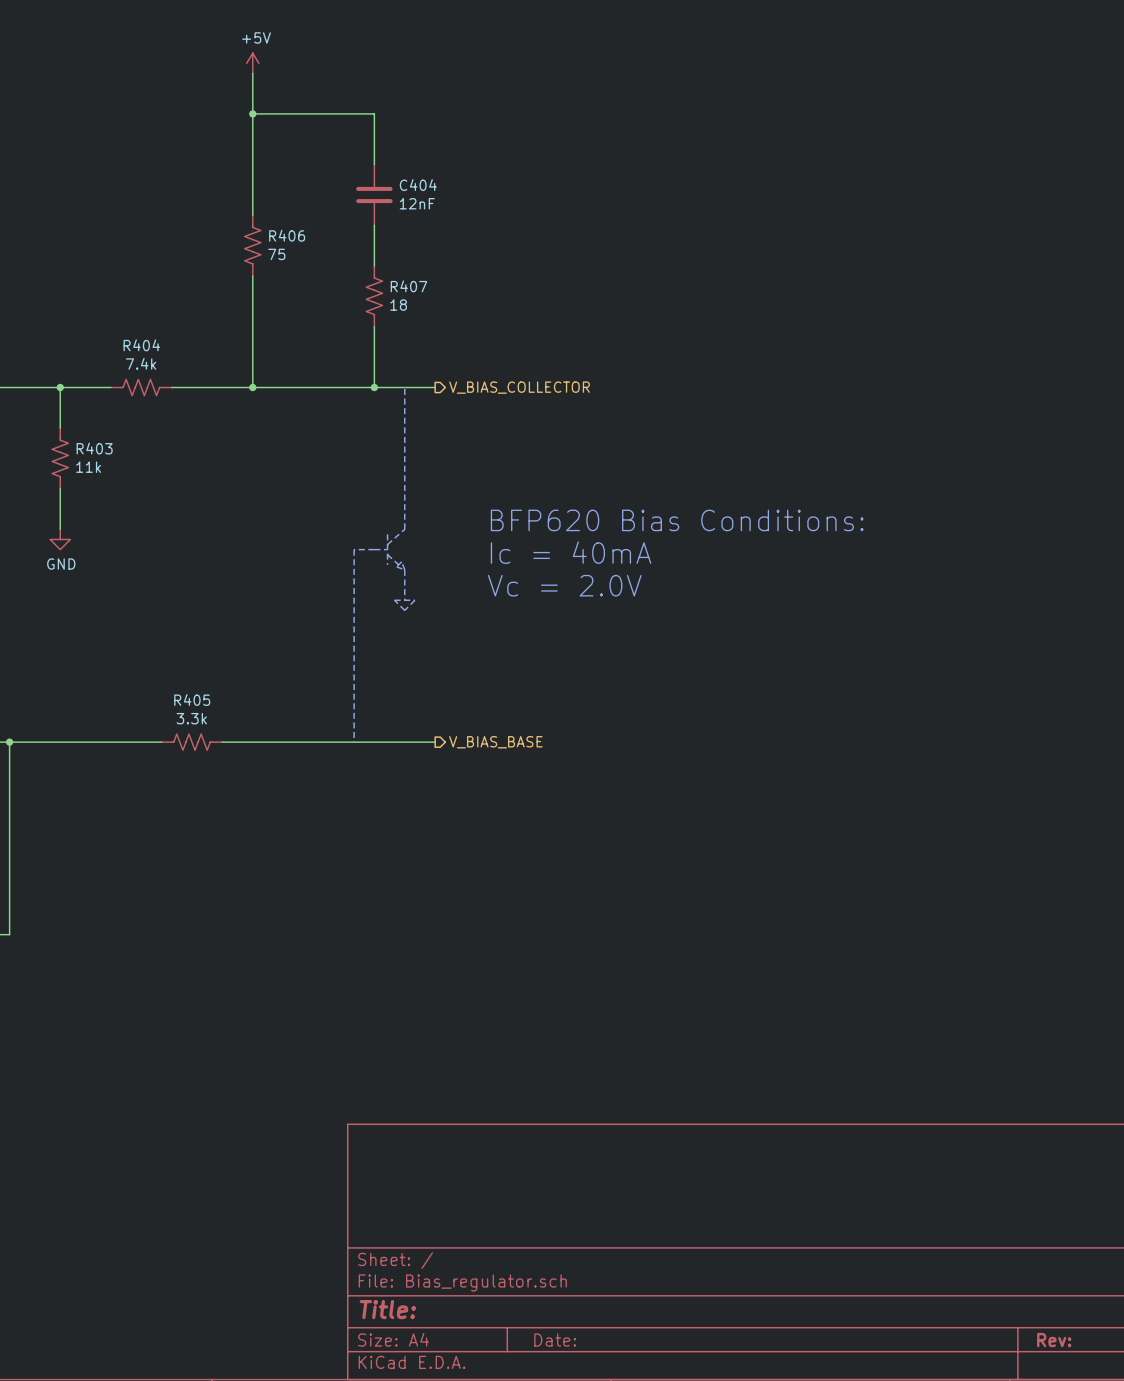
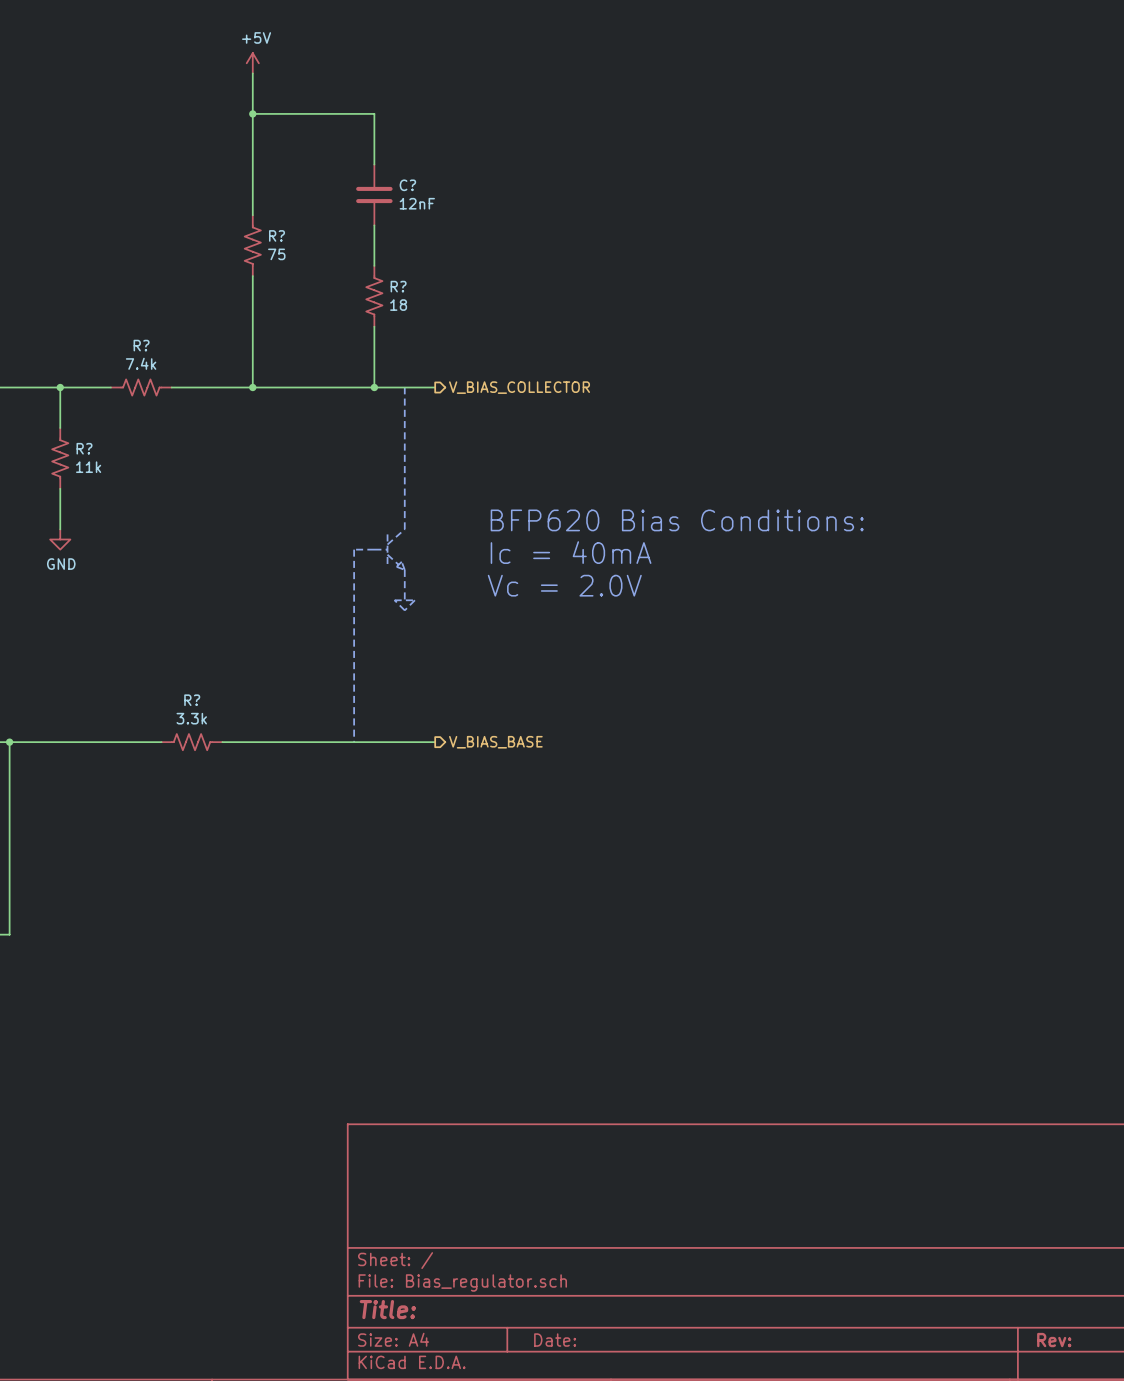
C404 name: C404 (418, 185) -> C? (407, 185)
R406 name: R406 (287, 235) -> R? (277, 235)
R407 name: R407 (408, 286) -> R? (398, 286)
R404 name: R404 (141, 345) -> R? (141, 345)
R403 name: R403 (94, 448) -> R? (84, 448)
R405 name: R405 (192, 699) -> R? (192, 700)

